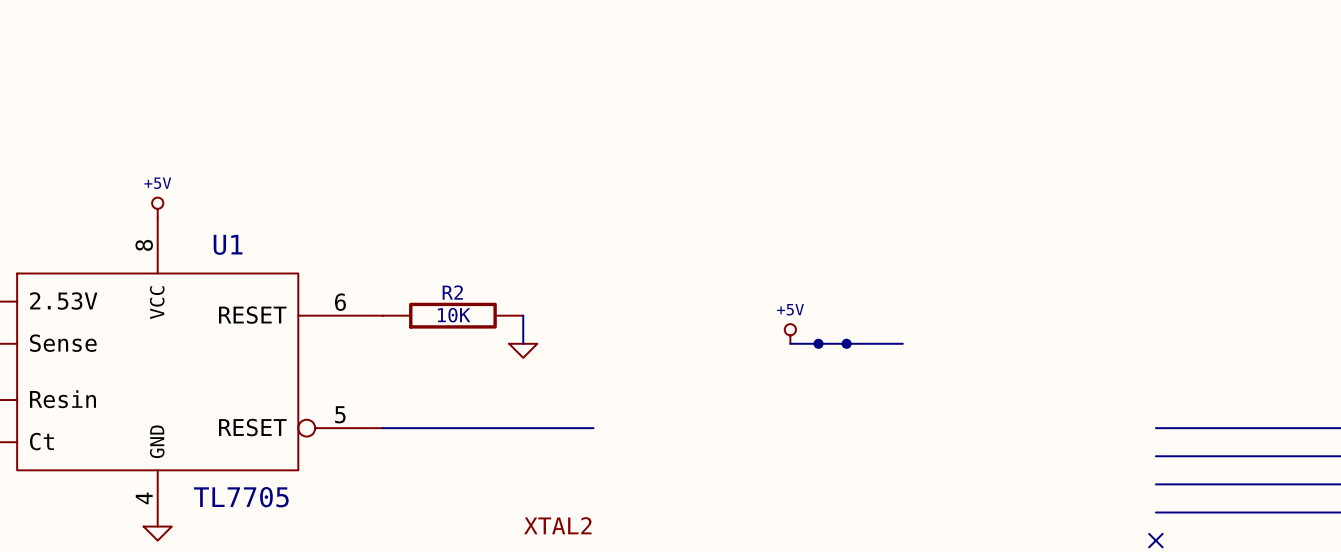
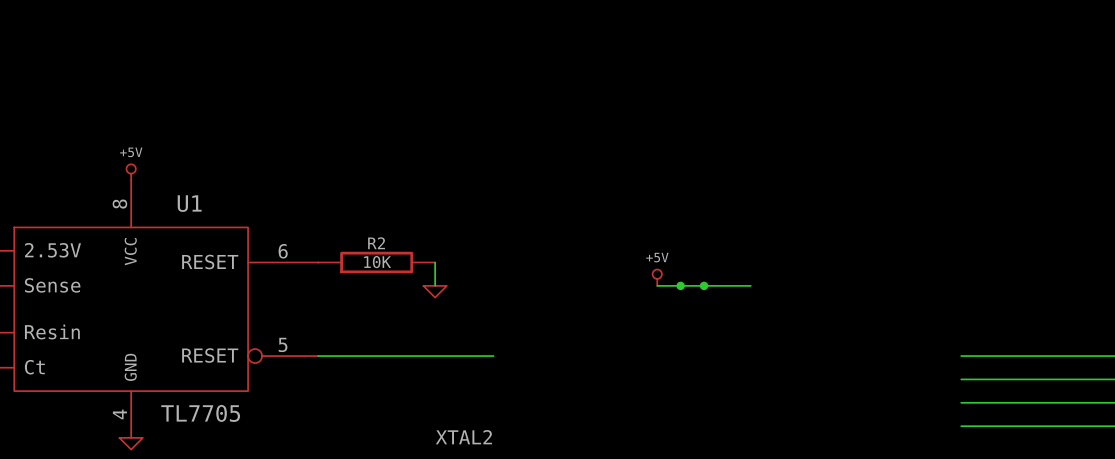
no-connect mark: (1155, 540) -> none

